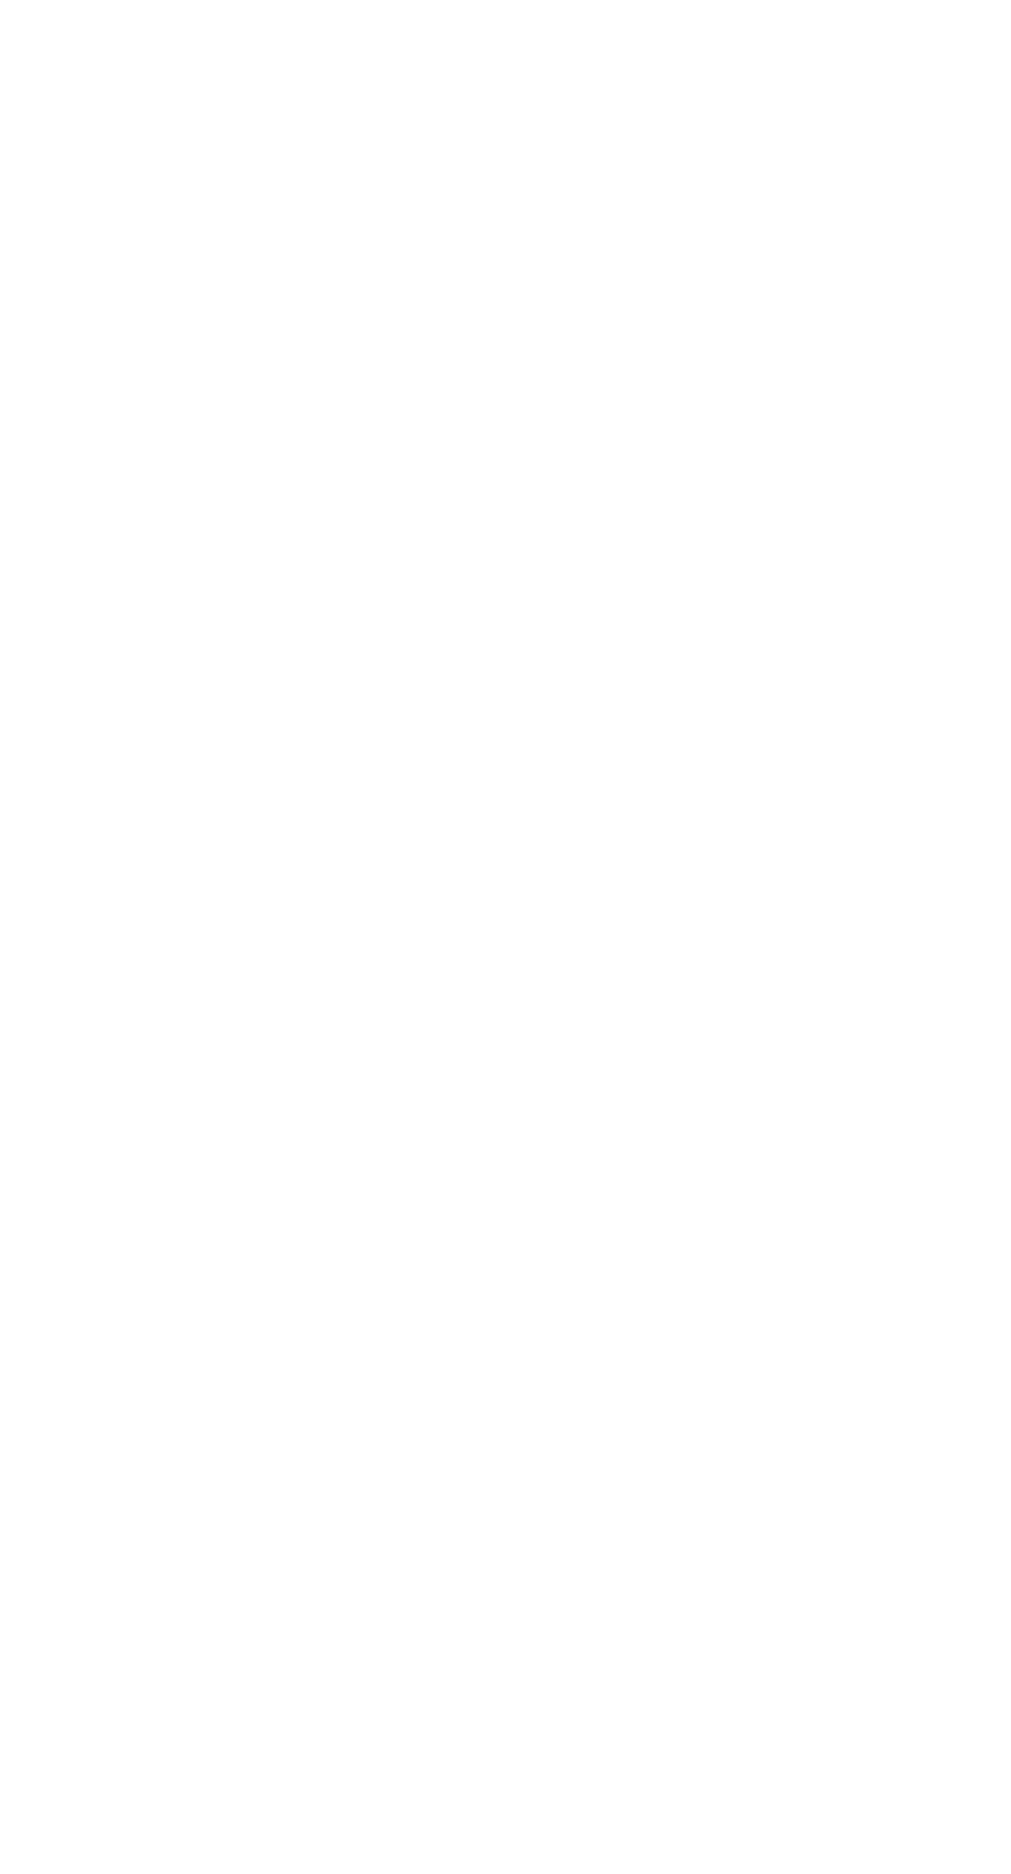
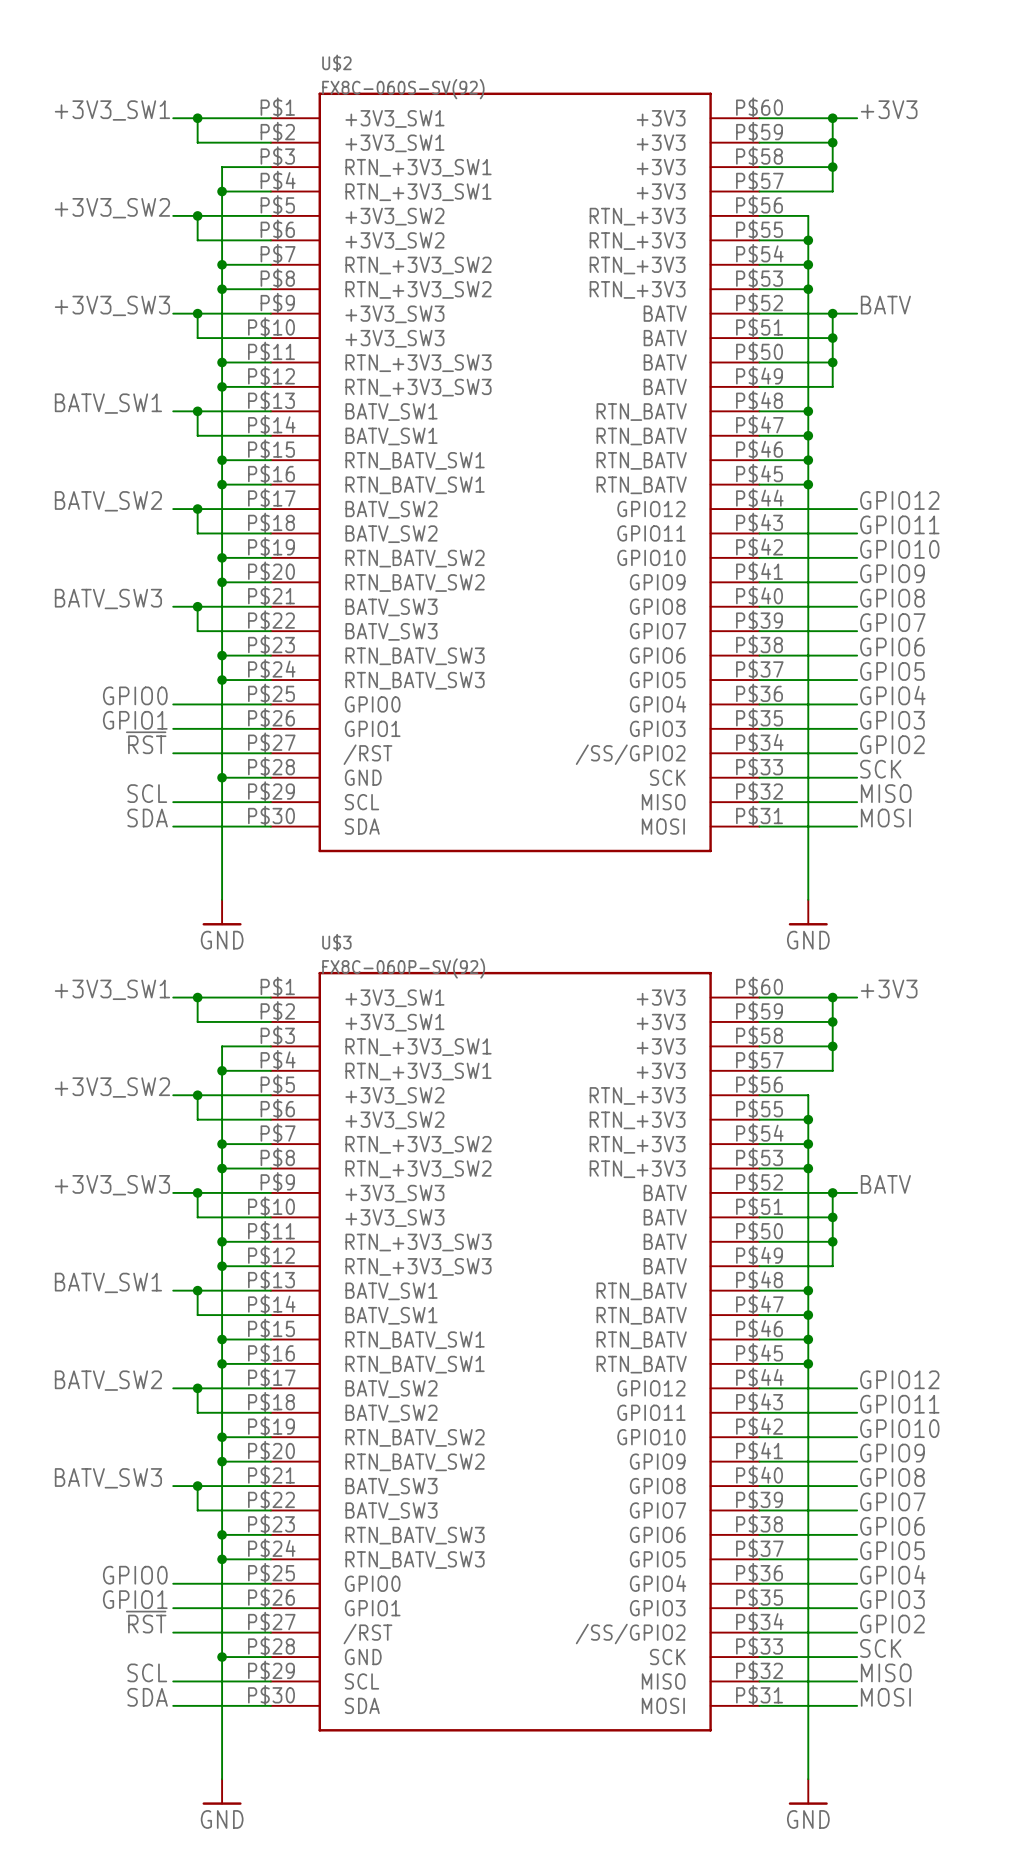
label: none -> +3V3 (889, 109)
label: none -> +3V3_SW1 (112, 110)
wire: none -> (173, 118) (270, 118)
wire: none -> (197, 118) (197, 142) (270, 142)
junction: none -> (197, 118)
wire: none -> (759, 118) (857, 118)
wire: none -> (832, 118) (832, 191) (759, 191)
junction: none -> (832, 118)
wire: none -> (759, 142) (832, 142)
junction: none -> (832, 142)
wire: none -> (270, 167) (222, 167) (222, 899)
wire: none -> (759, 167) (832, 167)
junction: none -> (832, 167)
wire: none -> (222, 191) (270, 191)
junction: none -> (222, 191)
label: none -> +3V3_SW2 (112, 208)
wire: none -> (173, 215) (270, 215)
wire: none -> (197, 215) (197, 240) (270, 240)
junction: none -> (197, 215)
wire: none -> (759, 215) (808, 215) (808, 899)
wire: none -> (759, 240) (808, 240)
junction: none -> (808, 240)
wire: none -> (222, 264) (270, 264)
junction: none -> (222, 264)
wire: none -> (759, 264) (808, 264)
junction: none -> (808, 264)
wire: none -> (222, 289) (270, 289)
junction: none -> (222, 289)
wire: none -> (759, 289) (808, 289)
junction: none -> (808, 289)
label: none -> +3V3_SW3 (112, 305)
label: none -> BATV (885, 305)
wire: none -> (173, 313) (270, 313)
wire: none -> (197, 313) (197, 338) (270, 338)
junction: none -> (197, 313)
wire: none -> (759, 313) (857, 313)
wire: none -> (832, 313) (832, 386) (759, 386)
junction: none -> (832, 313)
wire: none -> (759, 338) (832, 338)
junction: none -> (832, 338)
wire: none -> (222, 362) (270, 362)
junction: none -> (222, 362)
wire: none -> (759, 362) (832, 362)
junction: none -> (832, 362)
wire: none -> (222, 386) (270, 386)
junction: none -> (222, 386)
label: none -> BATV_SW1 (108, 403)
wire: none -> (173, 411) (270, 411)
wire: none -> (197, 411) (197, 435) (270, 435)
junction: none -> (197, 411)
wire: none -> (759, 411) (808, 411)
junction: none -> (808, 411)
wire: none -> (759, 435) (808, 435)
junction: none -> (808, 435)
wire: none -> (222, 460) (270, 460)
junction: none -> (222, 460)
wire: none -> (759, 460) (808, 460)
junction: none -> (808, 460)
U$2: none -> FX8C-060S-SV(92) (515, 472)
wire: none -> (222, 484) (270, 484)
junction: none -> (222, 484)
wire: none -> (759, 484) (808, 484)
junction: none -> (808, 484)
label: none -> GPIO12 (899, 500)
label: none -> BATV_SW2 (108, 501)
wire: none -> (173, 509) (270, 509)
wire: none -> (197, 509) (197, 533) (270, 533)
junction: none -> (197, 509)
wire: none -> (759, 509) (857, 509)
label: none -> GPIO11 (899, 524)
wire: none -> (759, 533) (857, 533)
label: none -> GPIO10 (899, 549)
wire: none -> (222, 557) (270, 557)
junction: none -> (222, 557)
wire: none -> (759, 557) (857, 557)
label: none -> GPIO9 (892, 573)
wire: none -> (222, 582) (270, 582)
junction: none -> (222, 582)
wire: none -> (759, 582) (857, 582)
label: none -> GPIO8 (892, 598)
label: none -> BATV_SW3 (108, 599)
wire: none -> (173, 606) (270, 606)
wire: none -> (197, 606) (197, 631) (270, 631)
junction: none -> (197, 606)
wire: none -> (759, 606) (857, 606)
label: none -> GPIO7 (892, 622)
wire: none -> (759, 631) (857, 631)
label: none -> GPIO6 (892, 647)
wire: none -> (222, 655) (270, 655)
junction: none -> (222, 655)
wire: none -> (759, 655) (857, 655)
label: none -> GPIO5 (892, 671)
wire: none -> (222, 680) (270, 680)
junction: none -> (222, 680)
wire: none -> (759, 680) (857, 680)
label: none -> GPIO0 (135, 695)
label: none -> GPIO4 (892, 695)
wire: none -> (173, 704) (270, 704)
wire: none -> (759, 704) (857, 704)
label: none -> GPIO1 (135, 720)
label: none -> GPIO3 (892, 720)
wire: none -> (173, 728) (270, 728)
wire: none -> (759, 728) (857, 728)
label: none -> ~{RST} (146, 742)
label: none -> GPIO2 (892, 744)
wire: none -> (173, 753) (270, 753)
wire: none -> (759, 753) (857, 753)
label: none -> SCK (880, 769)
wire: none -> (222, 777) (270, 777)
junction: none -> (222, 777)
wire: none -> (759, 777) (857, 777)
label: none -> SCL (147, 793)
label: none -> MISO (886, 793)
wire: none -> (173, 802) (270, 802)
wire: none -> (759, 802) (857, 802)
label: none -> SDA (147, 818)
label: none -> MOSI (885, 818)
wire: none -> (173, 826) (270, 826)
wire: none -> (759, 826) (857, 826)
power symbol: none -> GND (222, 912)
power symbol: none -> GND (808, 912)
label: none -> +3V3_SW1 (112, 989)
label: none -> +3V3 (889, 989)
wire: none -> (173, 997) (270, 997)
wire: none -> (197, 997) (197, 1021) (270, 1021)
junction: none -> (197, 997)
wire: none -> (759, 997) (857, 997)
wire: none -> (832, 997) (832, 1070) (759, 1070)
junction: none -> (832, 997)
wire: none -> (759, 1021) (832, 1021)
junction: none -> (832, 1021)
wire: none -> (270, 1046) (222, 1046) (222, 1779)
wire: none -> (759, 1046) (832, 1046)
junction: none -> (832, 1046)
wire: none -> (222, 1070) (270, 1070)
junction: none -> (222, 1070)
label: none -> +3V3_SW2 (112, 1087)
wire: none -> (173, 1095) (270, 1095)
wire: none -> (197, 1095) (197, 1119) (270, 1119)
junction: none -> (197, 1095)
wire: none -> (759, 1095) (808, 1095) (808, 1779)
wire: none -> (759, 1119) (808, 1119)
junction: none -> (808, 1119)
wire: none -> (222, 1144) (270, 1144)
junction: none -> (222, 1144)
wire: none -> (759, 1144) (808, 1144)
junction: none -> (808, 1144)
wire: none -> (222, 1168) (270, 1168)
junction: none -> (222, 1168)
wire: none -> (759, 1168) (808, 1168)
junction: none -> (808, 1168)
label: none -> BATV (885, 1184)
label: none -> +3V3_SW3 (112, 1185)
wire: none -> (173, 1192) (270, 1192)
wire: none -> (197, 1192) (197, 1217) (270, 1217)
junction: none -> (197, 1192)
wire: none -> (759, 1192) (857, 1192)
wire: none -> (832, 1192) (832, 1266) (759, 1266)
junction: none -> (832, 1192)
wire: none -> (759, 1217) (832, 1217)
junction: none -> (832, 1217)
wire: none -> (222, 1241) (270, 1241)
junction: none -> (222, 1241)
wire: none -> (759, 1241) (832, 1241)
junction: none -> (832, 1241)
wire: none -> (222, 1266) (270, 1266)
junction: none -> (222, 1266)
label: none -> BATV_SW1 (108, 1282)
wire: none -> (173, 1290) (270, 1290)
wire: none -> (197, 1290) (197, 1315) (270, 1315)
junction: none -> (197, 1290)
wire: none -> (759, 1290) (808, 1290)
junction: none -> (808, 1290)
wire: none -> (759, 1315) (808, 1315)
junction: none -> (808, 1315)
wire: none -> (222, 1339) (270, 1339)
junction: none -> (222, 1339)
wire: none -> (759, 1339) (808, 1339)
junction: none -> (808, 1339)
U$3: none -> FX8C-060P-SV(92) (515, 1351)
wire: none -> (222, 1363) (270, 1363)
junction: none -> (222, 1363)
wire: none -> (759, 1363) (808, 1363)
junction: none -> (808, 1363)
label: none -> GPIO12 (899, 1379)
label: none -> BATV_SW2 (108, 1380)
wire: none -> (173, 1388) (270, 1388)
wire: none -> (197, 1388) (197, 1412) (270, 1412)
junction: none -> (197, 1388)
wire: none -> (759, 1388) (857, 1388)
label: none -> GPIO11 (899, 1404)
wire: none -> (759, 1412) (857, 1412)
label: none -> GPIO10 (899, 1428)
wire: none -> (222, 1437) (270, 1437)
junction: none -> (222, 1437)
wire: none -> (759, 1437) (857, 1437)
label: none -> GPIO9 (892, 1453)
wire: none -> (222, 1461) (270, 1461)
junction: none -> (222, 1461)
wire: none -> (759, 1461) (857, 1461)
label: none -> GPIO8 (892, 1477)
label: none -> BATV_SW3 (108, 1478)
wire: none -> (173, 1486) (270, 1486)
wire: none -> (197, 1486) (197, 1510) (270, 1510)
junction: none -> (197, 1486)
wire: none -> (759, 1486) (857, 1486)
label: none -> GPIO7 (892, 1501)
wire: none -> (759, 1510) (857, 1510)
label: none -> GPIO6 (892, 1526)
wire: none -> (222, 1534) (270, 1534)
junction: none -> (222, 1534)
wire: none -> (759, 1534) (857, 1534)
label: none -> GPIO5 (892, 1550)
wire: none -> (222, 1559) (270, 1559)
junction: none -> (222, 1559)
wire: none -> (759, 1559) (857, 1559)
label: none -> GPIO4 (892, 1574)
label: none -> GPIO0 (135, 1575)
wire: none -> (173, 1583) (270, 1583)
wire: none -> (759, 1583) (857, 1583)
label: none -> GPIO1 (135, 1599)
label: none -> GPIO3 (892, 1599)
wire: none -> (173, 1608) (270, 1608)
wire: none -> (759, 1608) (857, 1608)
label: none -> ~{RST} (146, 1622)
label: none -> GPIO2 (892, 1624)
wire: none -> (173, 1632) (270, 1632)
wire: none -> (759, 1632) (857, 1632)
label: none -> SCK (880, 1648)
wire: none -> (222, 1657) (270, 1657)
junction: none -> (222, 1657)
wire: none -> (759, 1657) (857, 1657)
label: none -> SCL (147, 1672)
label: none -> MISO (886, 1672)
wire: none -> (173, 1681) (270, 1681)
wire: none -> (759, 1681) (857, 1681)
label: none -> SDA (147, 1697)
label: none -> MOSI (885, 1697)
wire: none -> (173, 1705) (270, 1705)
wire: none -> (759, 1705) (857, 1705)
power symbol: none -> GND (222, 1791)
power symbol: none -> GND (808, 1791)

